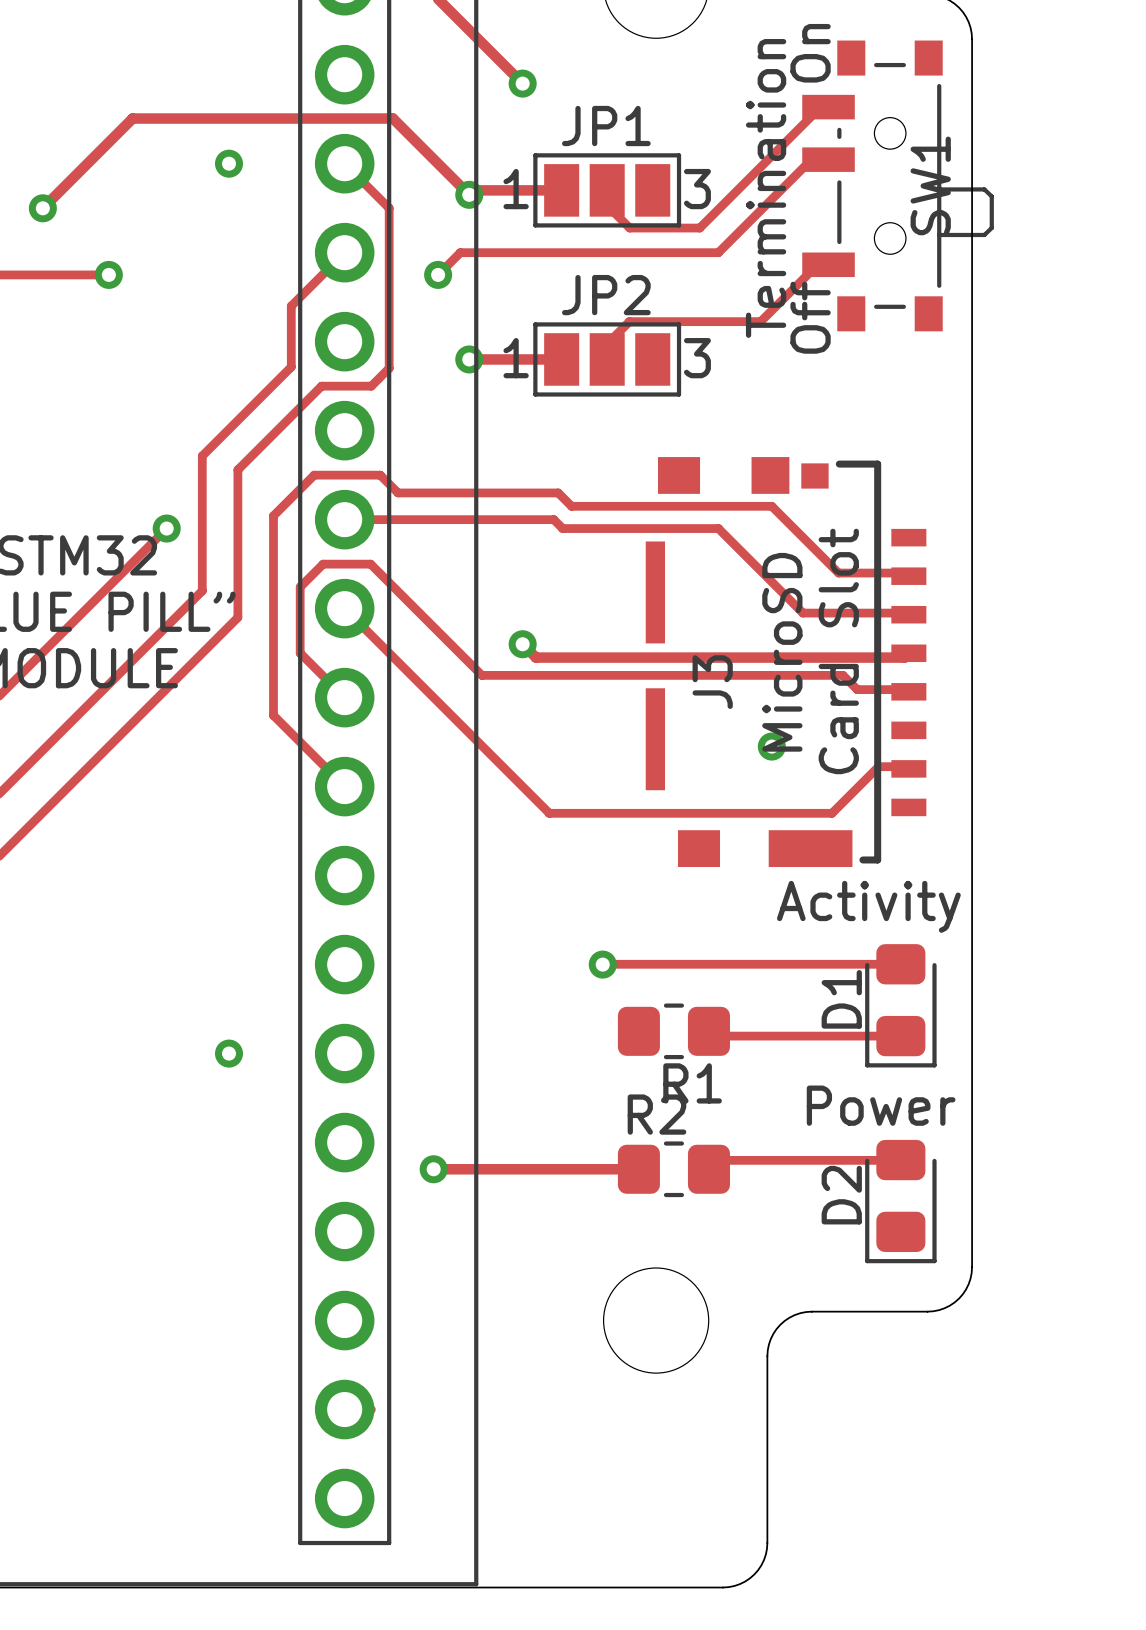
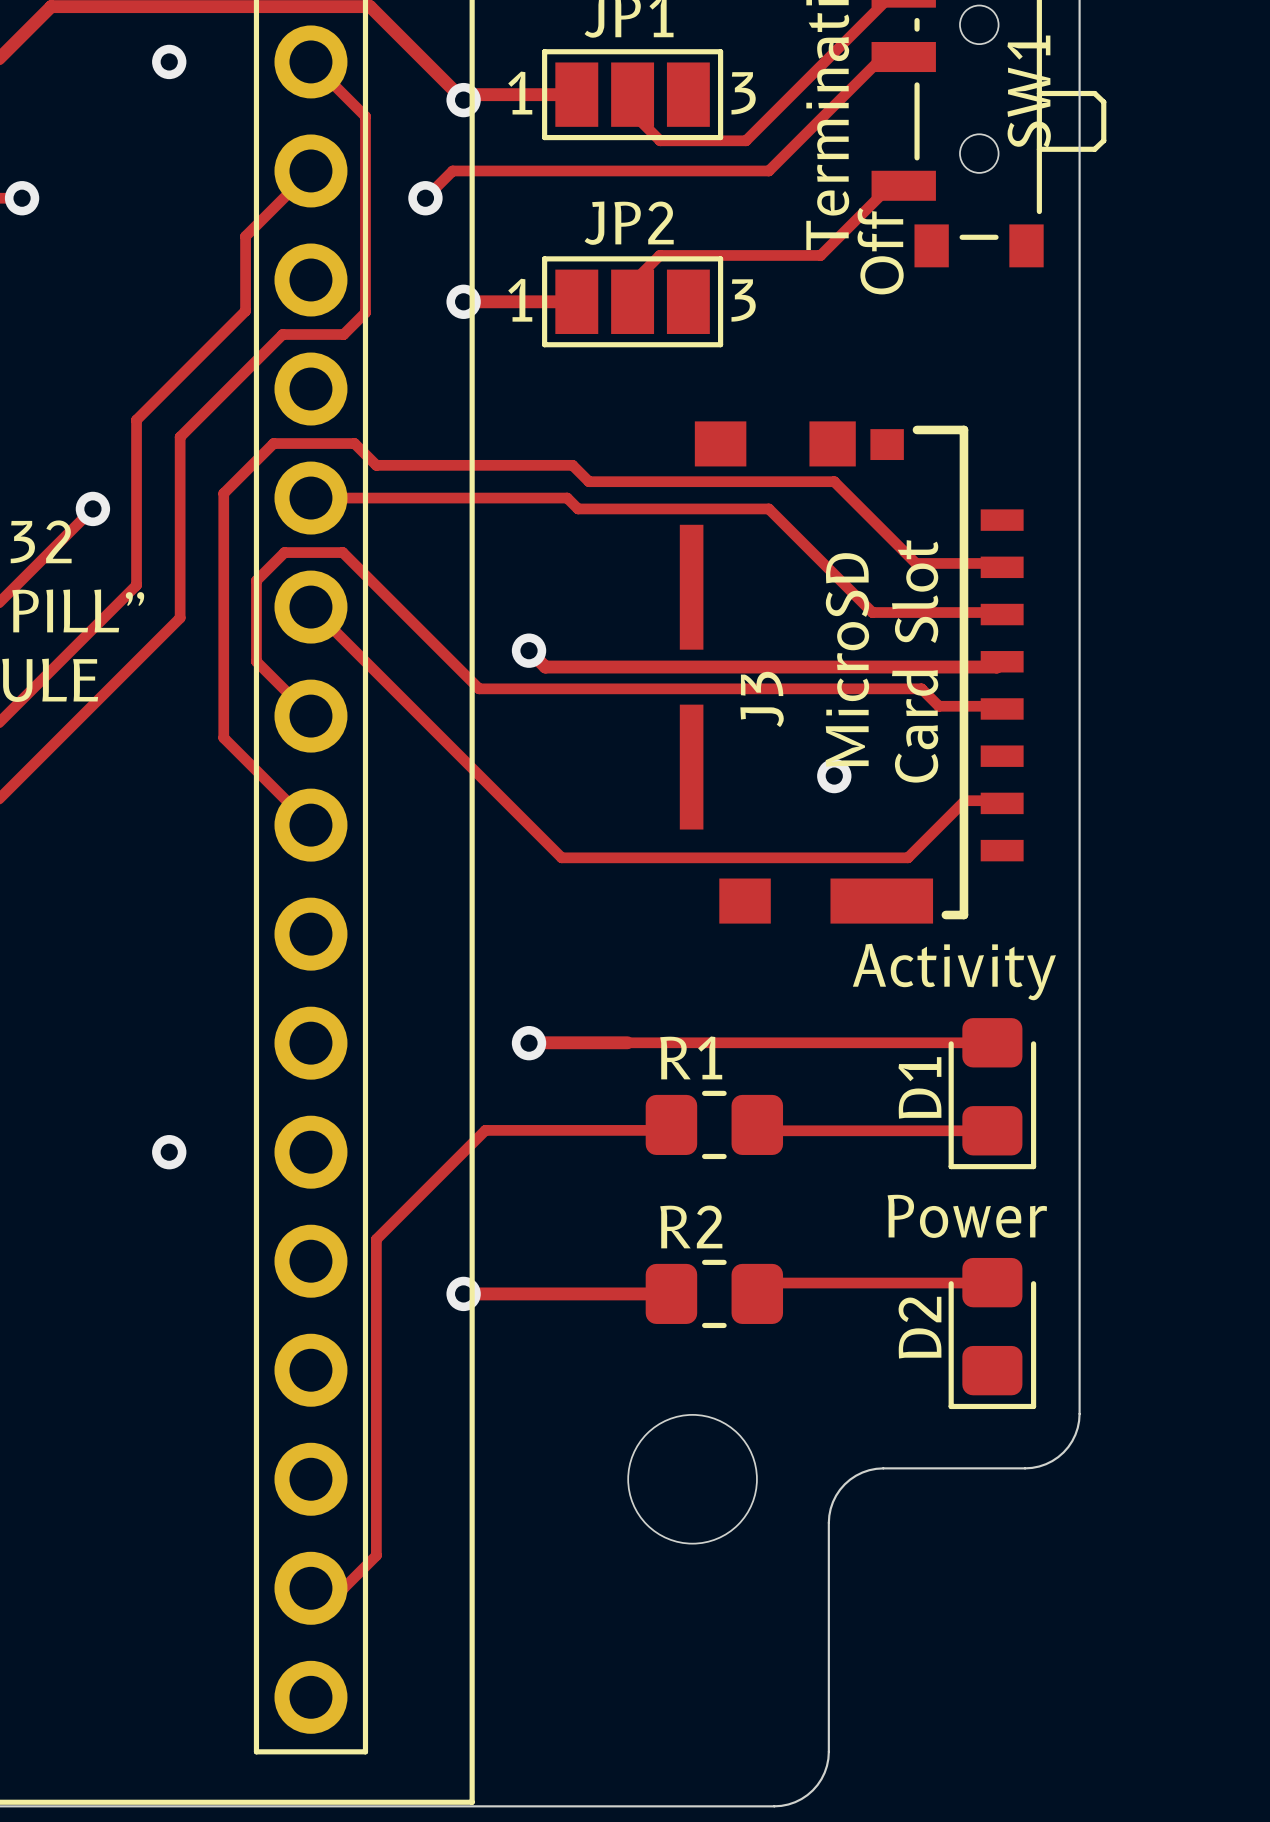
track: none -> (529, 1042) (627, 1042)
via position: (602, 964) -> (529, 1043)
track: none -> (671, 1130) (485, 1130) (376, 1239) (376, 1555) (343, 1588)
R1 name position: R1 (692, 1083) -> R1 (691, 1057)
track: (433, 1169) (469, 1169) -> none
via position: (433, 1169) -> (463, 1293)

